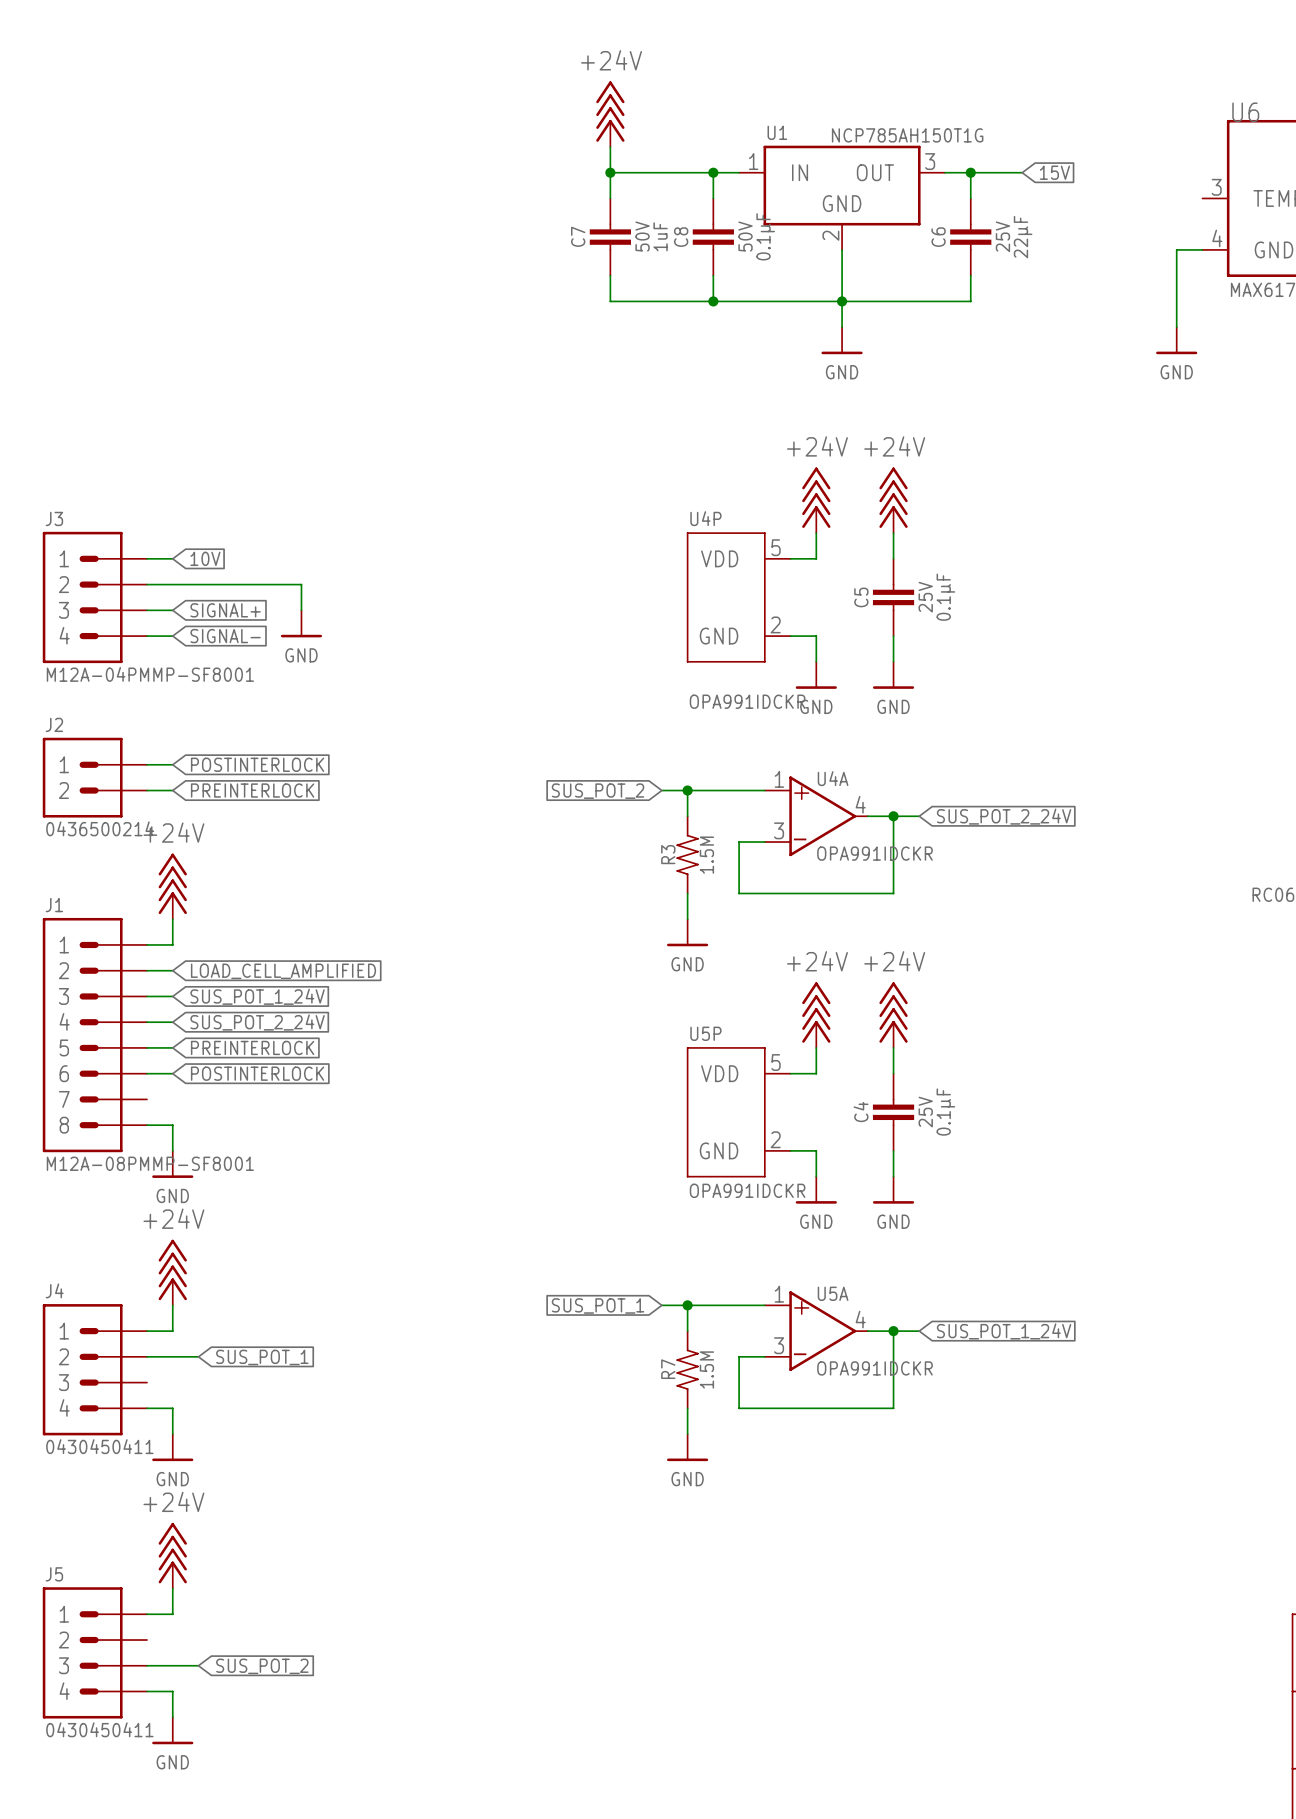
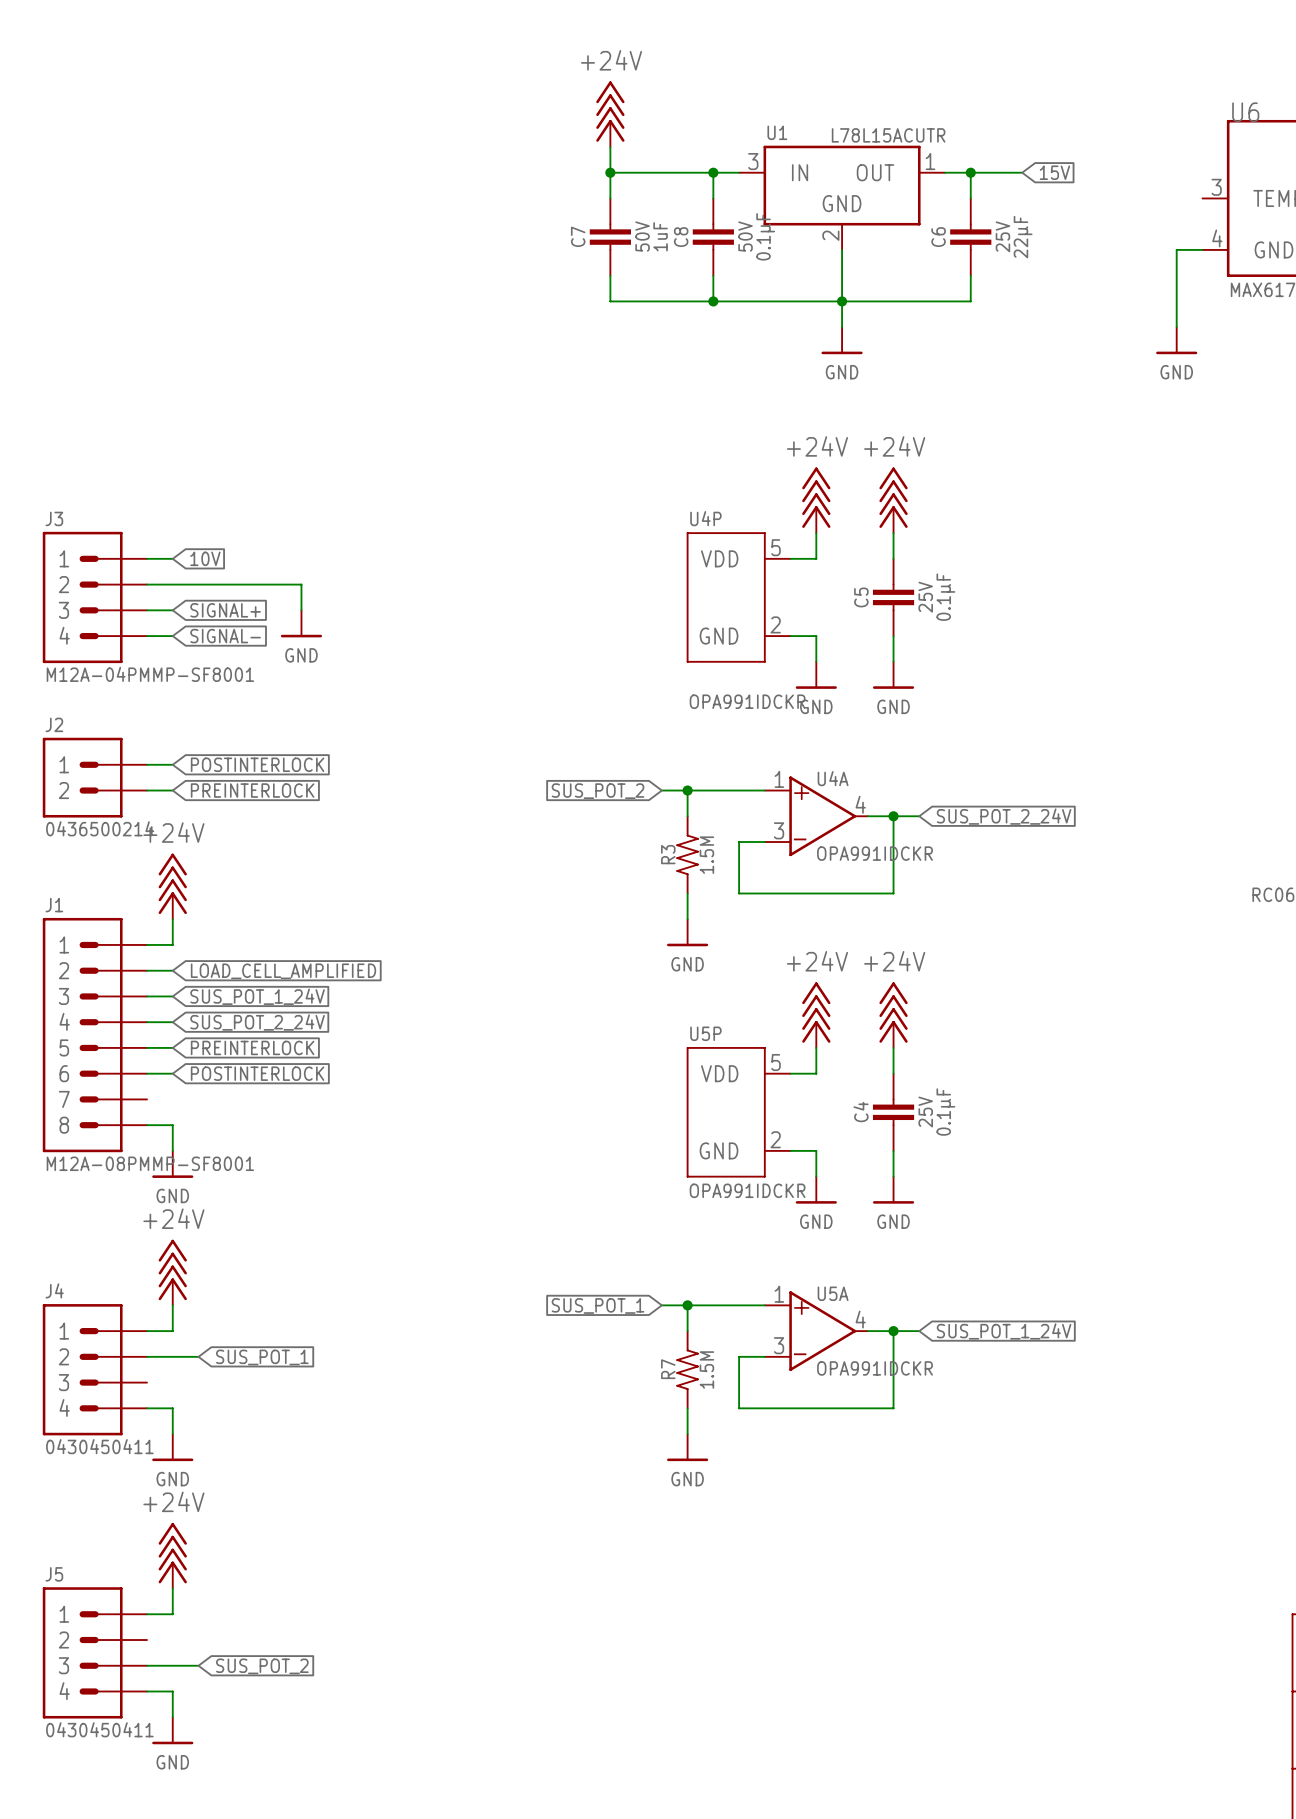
U1 text: NCP785AH150T1G (907, 135) -> L78L15ACUTR (888, 135)
U1 pin number: 1 (753, 161) -> 3 (753, 161)
U1 pin number: 3 (930, 161) -> 1 (930, 161)

